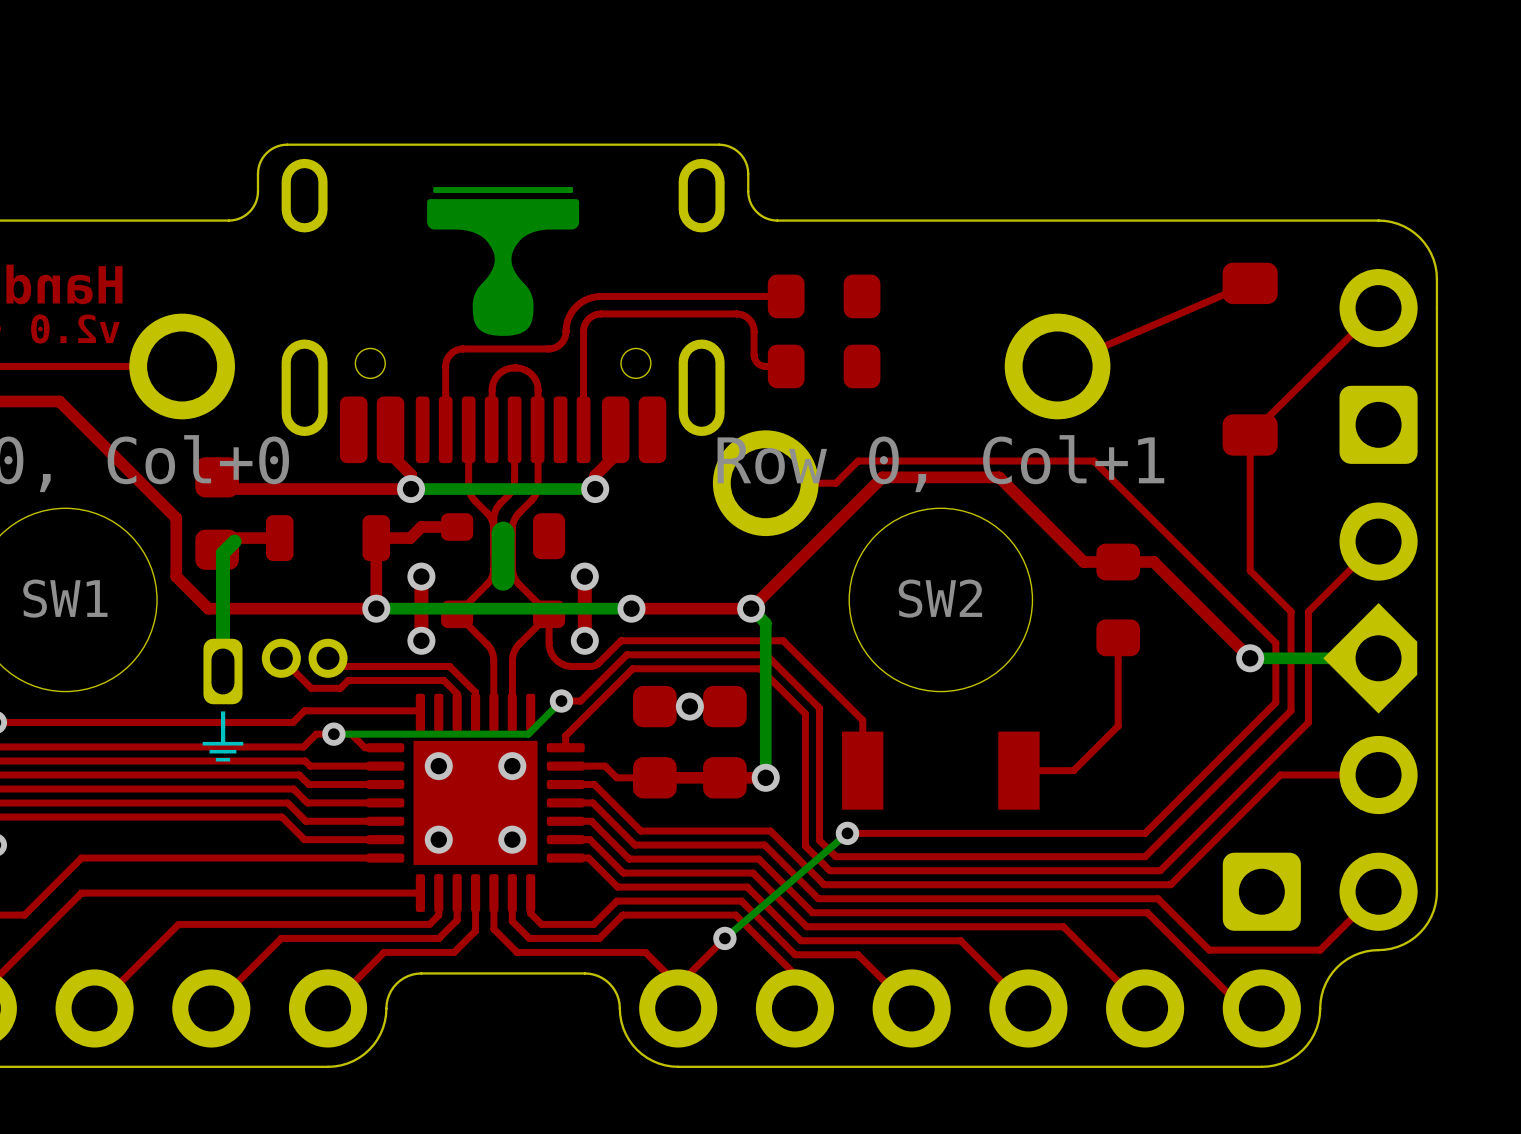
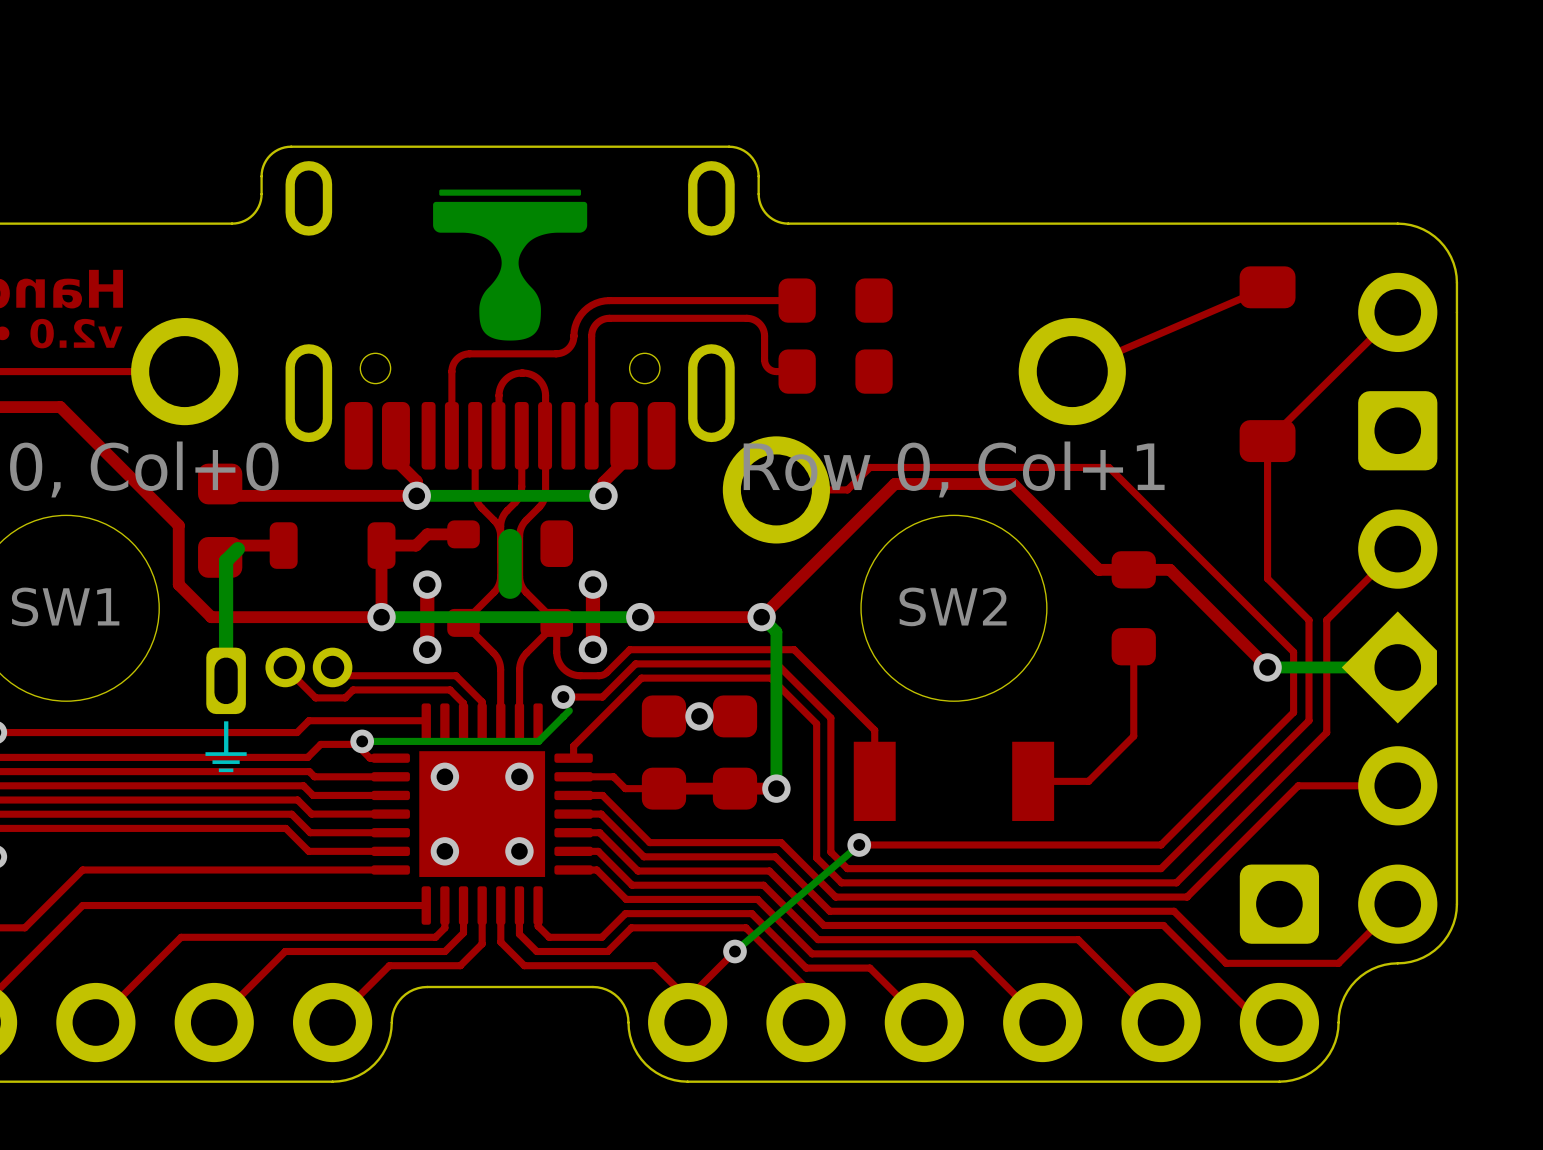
top track: (594, 687) (580, 701) (561, 701) -> (602, 697) (563, 697)
via position: (561, 701) -> (563, 697)
bottom track: (531, 731) (528, 734) (339, 734) (333, 740) -> (538, 741) (362, 741)
via position: (333, 734) -> (362, 741)

